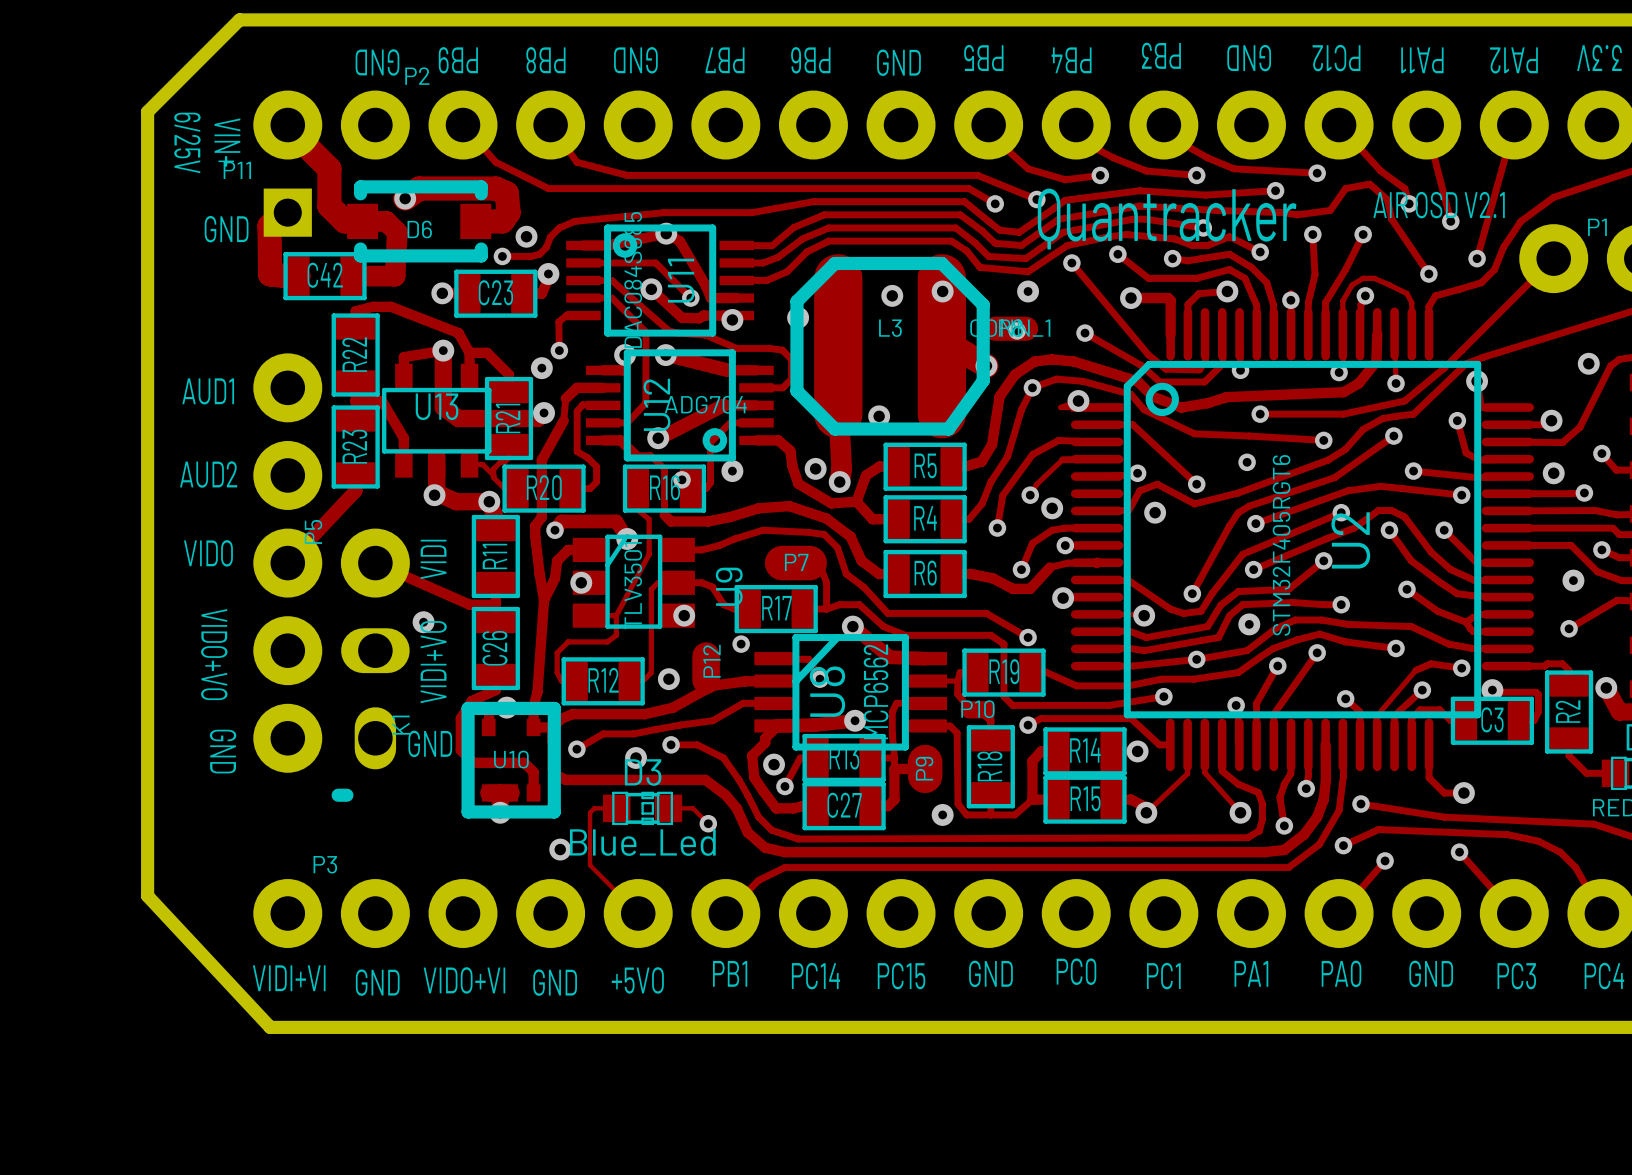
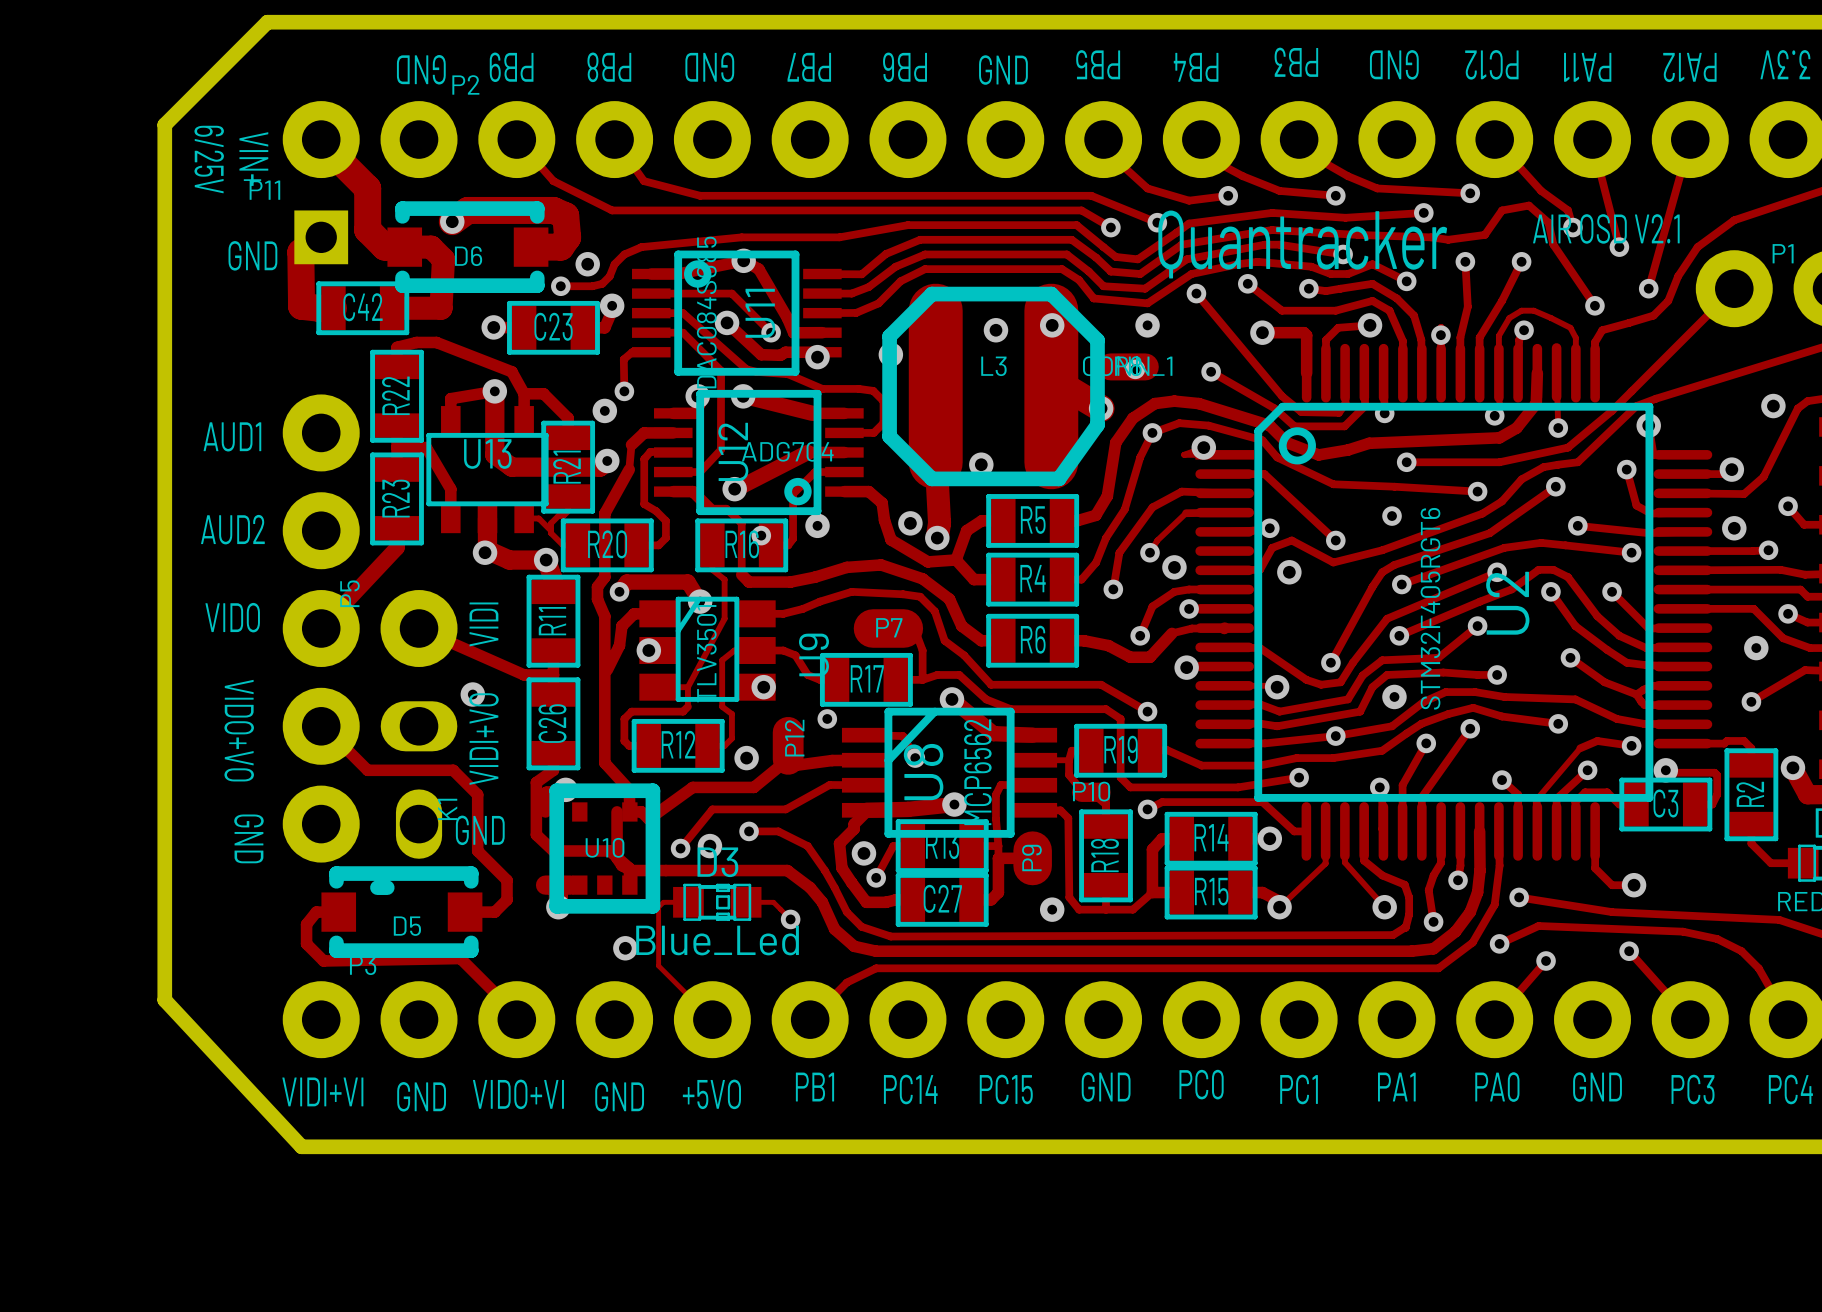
track: (535, 536) (544, 600) (537, 692) (533, 707) (533, 727) (552, 727) -> (597, 599) (604, 616) (604, 762) (629, 789) (629, 811) (641, 811) (648, 819) (692, 787) (753, 787) (780, 765) (795, 765)
track: (657, 582) (651, 589) (651, 672) (642, 681) (629, 681) -> (734, 650) (722, 660) (722, 706) (731, 714) (731, 738) (724, 745) (707, 745)
track: (616, 633) (616, 635) (607, 641) (568, 641) (557, 652) (557, 672) (561, 681) (576, 681) -> (687, 706) (683, 711) (631, 711) (624, 718) (624, 740) (629, 745) (648, 745)
track: none -> (321, 726) (323, 726) (367, 770) (453, 770) (477, 794) (477, 850) (507, 880) (507, 899) (494, 912) (465, 912) (463, 909) (465, 912)
R12 position: (603, 681) -> (678, 745)
track: (712, 685) (673, 707) (644, 714) (572, 714) (561, 718) (552, 727) (552, 741) -> none
track: (495, 690) (471, 701) (460, 718) (460, 750) (473, 762) (524, 762) (533, 772) (533, 792) -> (553, 770) (536, 782) (536, 834) (553, 850) (609, 850) (629, 868) (629, 885)
track: (743, 703) (712, 720) (633, 733) (603, 733) (576, 749) -> (829, 784) (785, 809) (712, 809) (680, 848)
via position: (576, 749) -> (680, 848)
U10 position: (511, 760) -> (604, 848)
track: none -> (338, 912) (316, 912) (306, 924) (306, 943) (323, 960) (460, 958) (519, 1017) (519, 1019) (516, 1019)
D5: none -> (401, 912)

